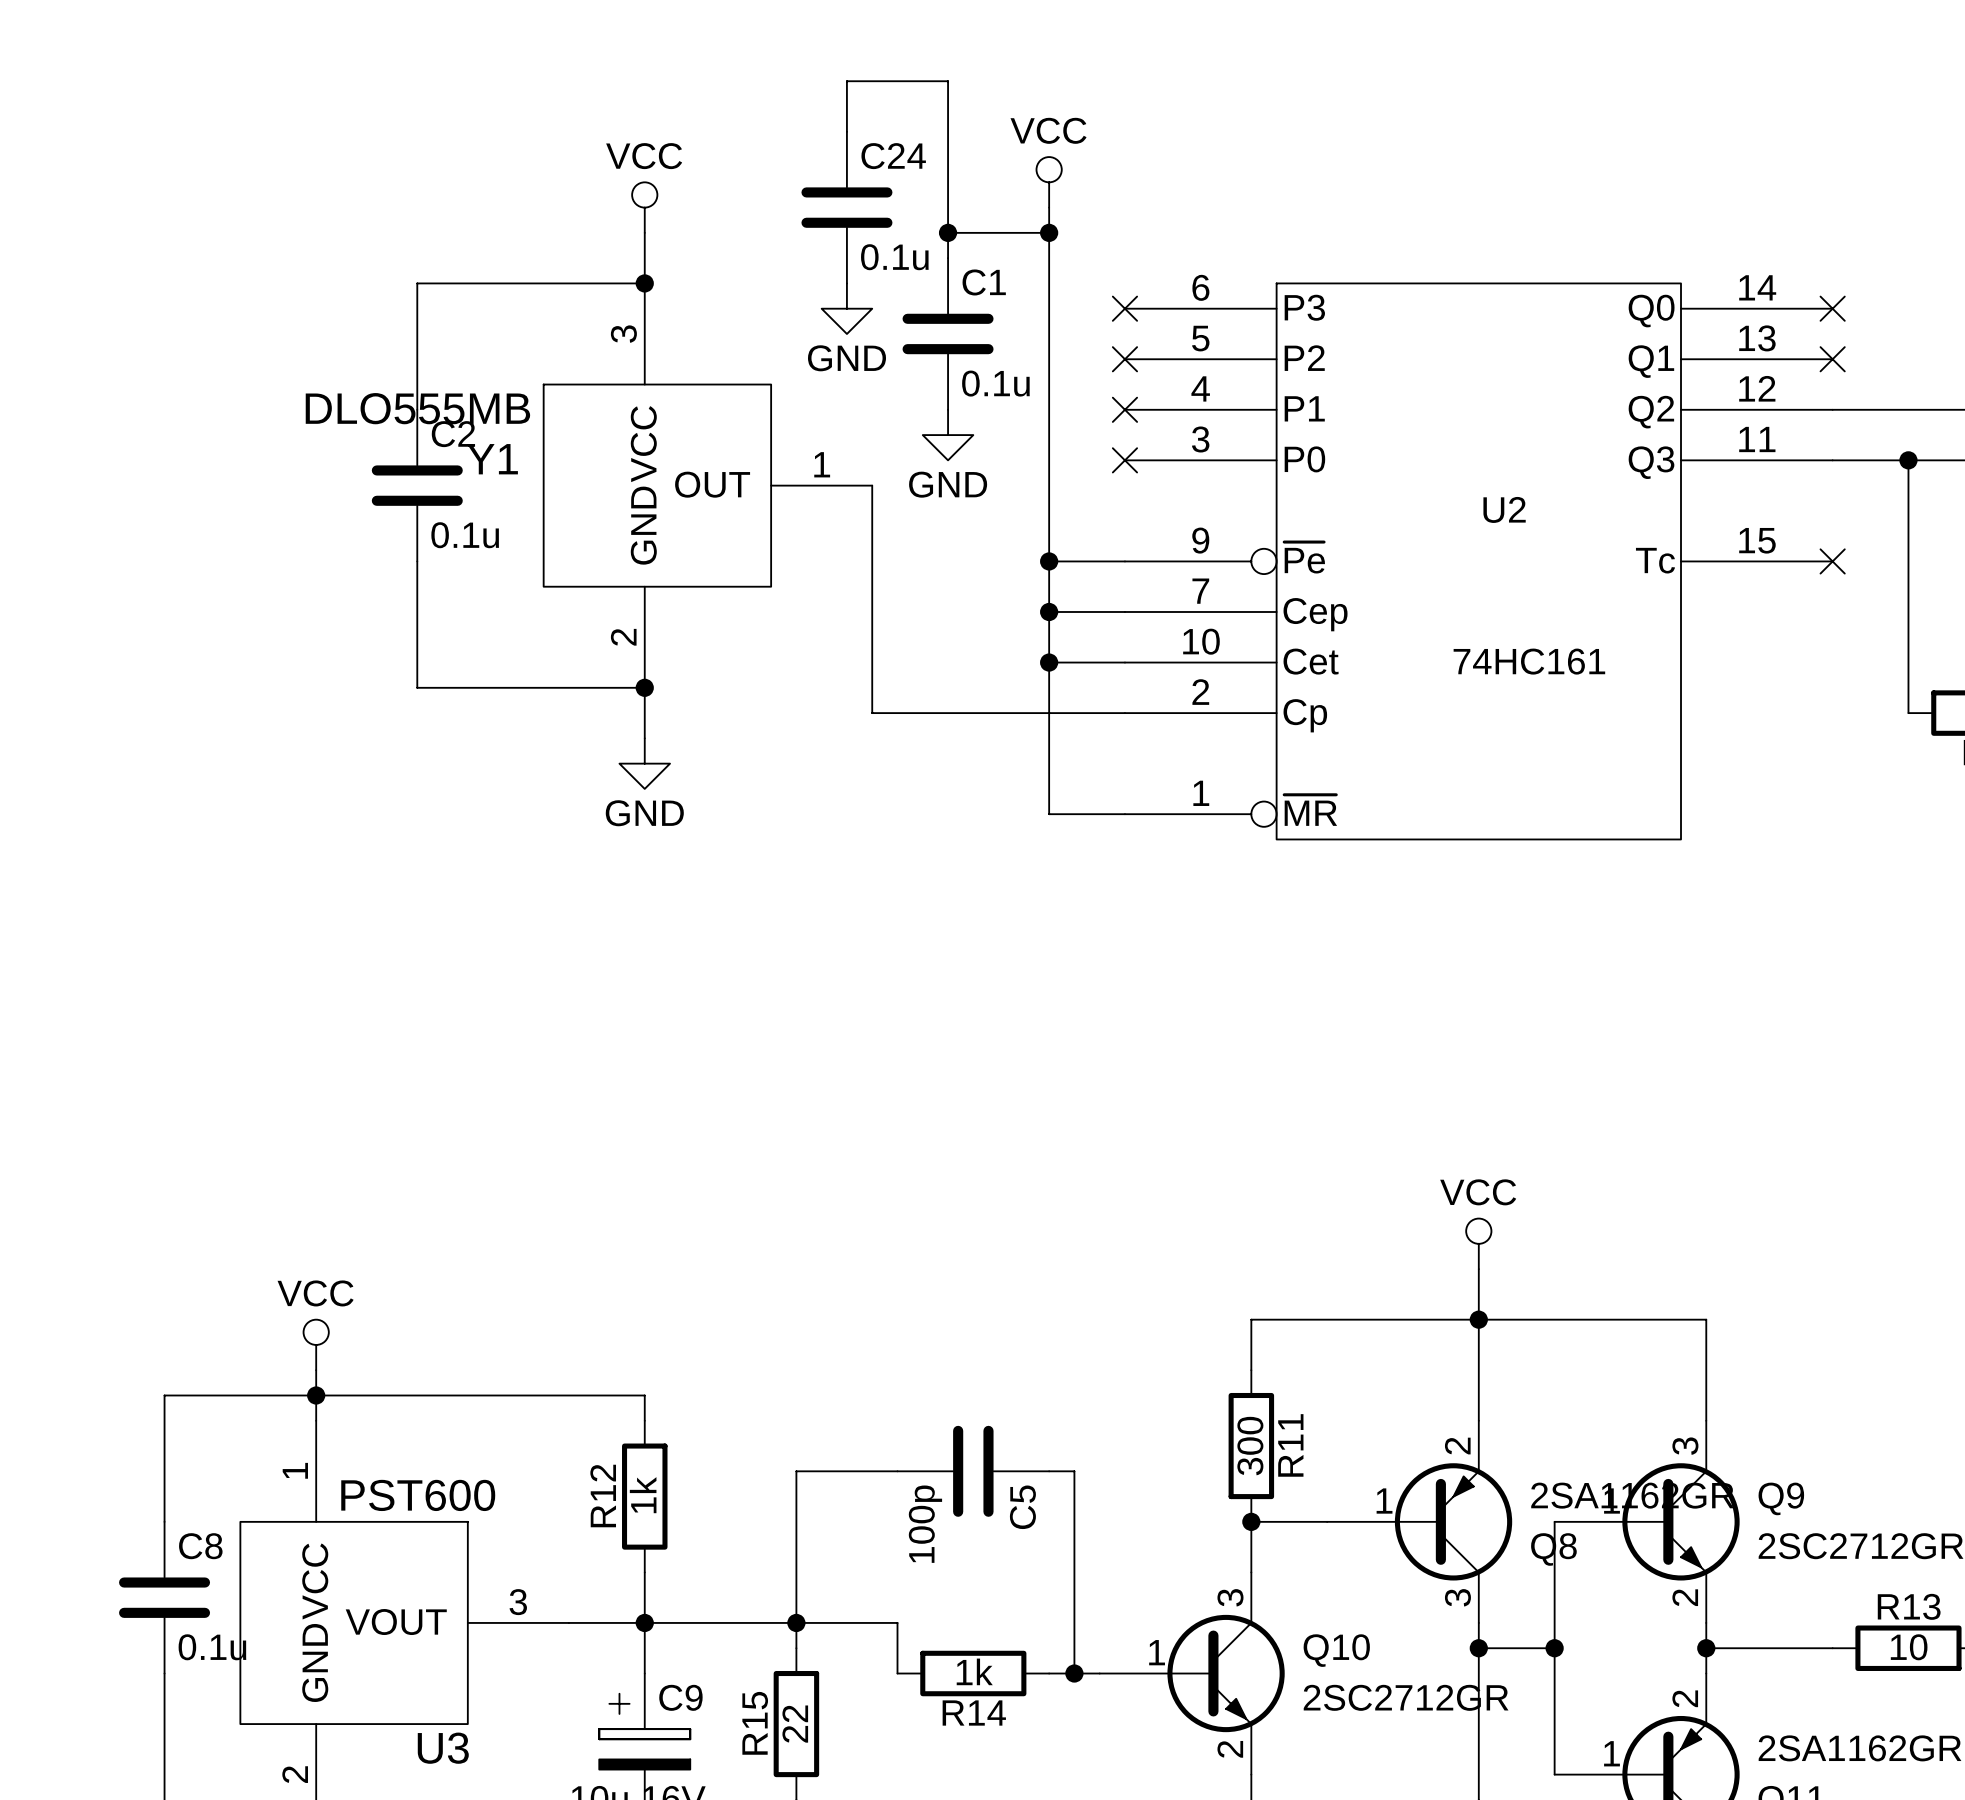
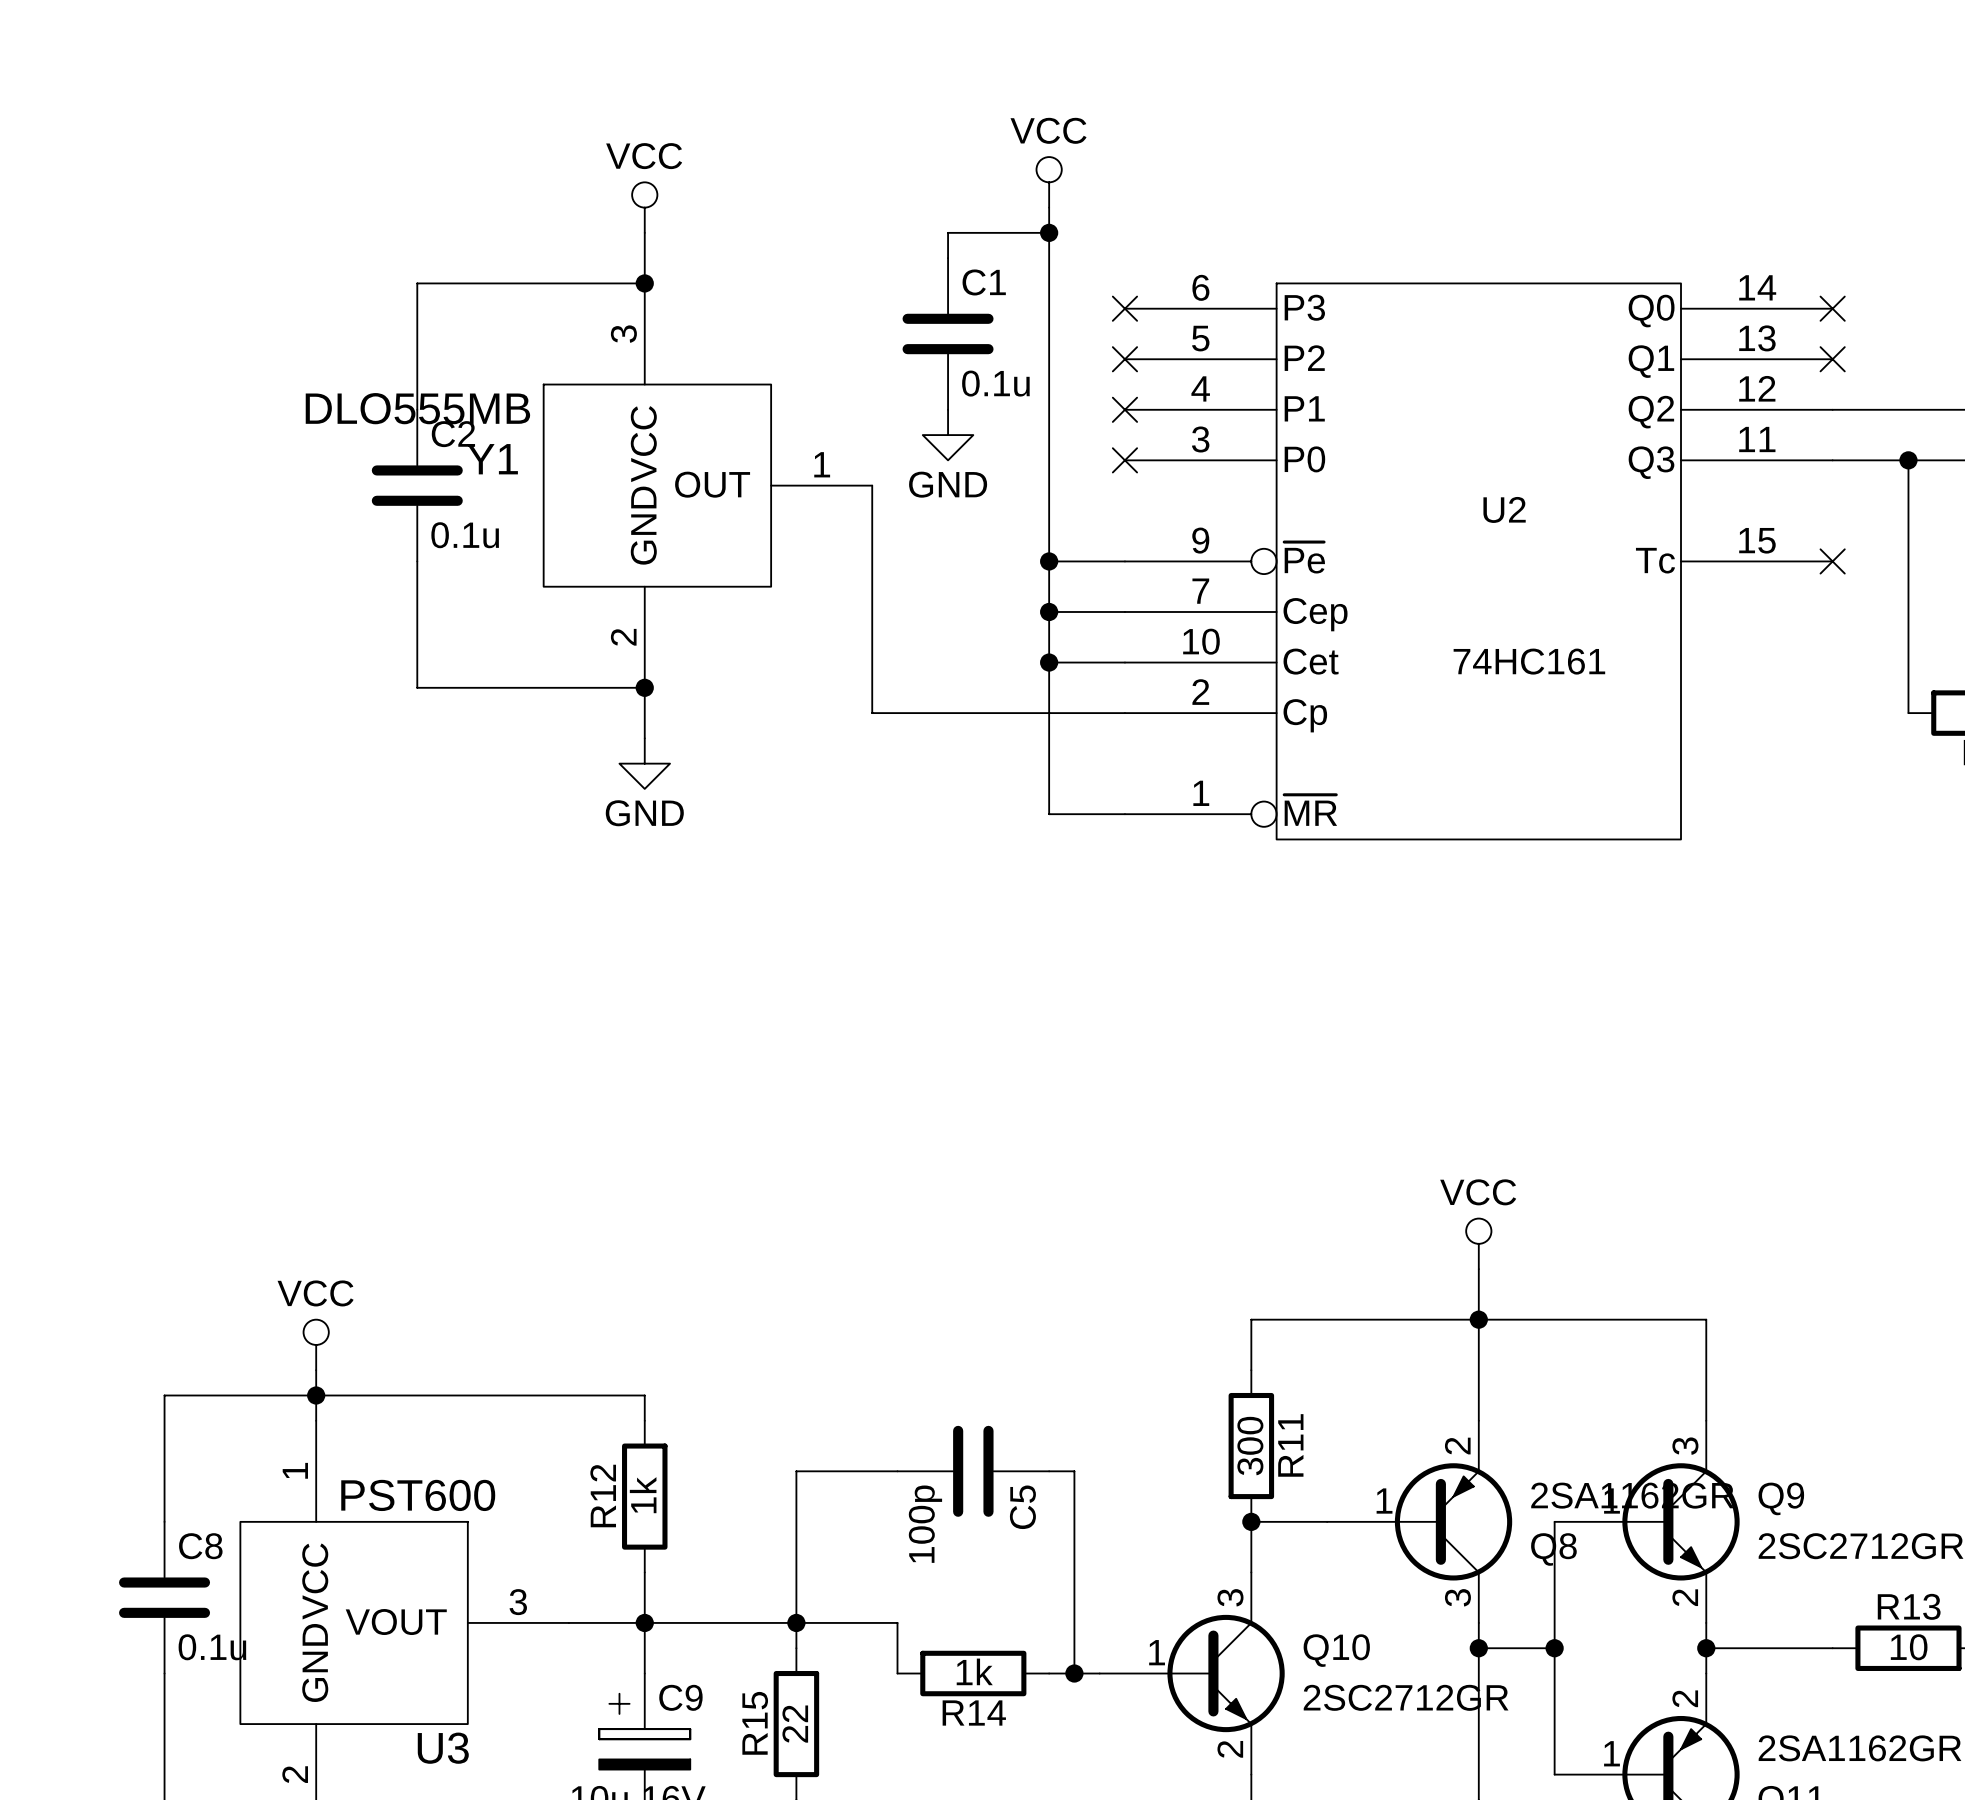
wire: (846, 131) (846, 81) (948, 81) (948, 232) -> none
C24: 0.1u (846, 207) -> none
junction: (948, 232) -> none
power symbol: GND (846, 308) -> none

